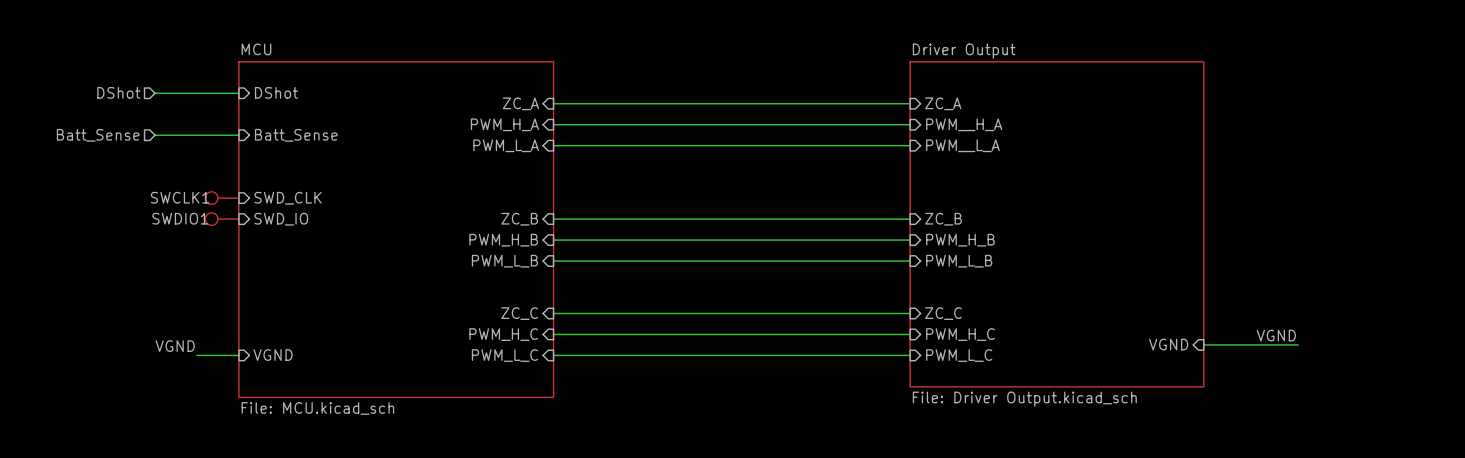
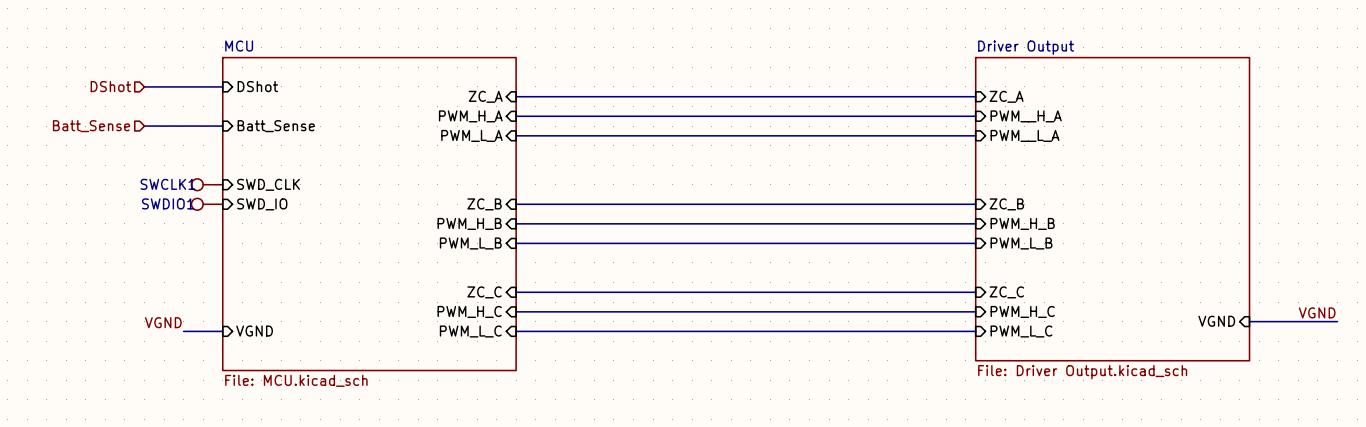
wire: none -> (848, 96) (975, 96)
sheet pin position: ZC_A (943, 103) -> ZC_A (1006, 96)
wire: none -> (848, 116) (975, 116)
sheet pin position: PWM__H_A (964, 124) -> PWM__H_A (1026, 116)
wire: none -> (848, 135) (975, 135)
sheet pin position: PWM__L_A (962, 145) -> PWM__L_A (1024, 135)
wire: none -> (848, 204) (975, 204)
sheet pin position: ZC_B (943, 219) -> ZC_B (1006, 204)
sheet Driver Output position: (1056, 224) -> (1112, 209)
wire: none -> (848, 223) (975, 223)
sheet pin position: PWM_H_B (960, 240) -> PWM_H_B (1022, 223)
wire: none -> (848, 243) (975, 243)
sheet pin position: PWM_L_B (959, 261) -> PWM_L_B (1021, 243)
wire: none -> (848, 292) (975, 292)
sheet pin position: ZC_C (943, 313) -> ZC_C (1006, 292)
wire: none -> (848, 311) (975, 311)
sheet pin position: PWM_H_C (960, 334) -> PWM_H_C (1022, 311)
label position: VGND (1276, 335) -> VGND (1317, 312)
sheet pin position: VGND (1168, 344) -> VGND (1216, 321)
wire: (1203, 344) (1298, 344) -> (1249, 321) (1337, 321)
wire: none -> (848, 331) (975, 331)
sheet pin position: PWM_L_C (959, 355) -> PWM_L_C (1021, 331)

